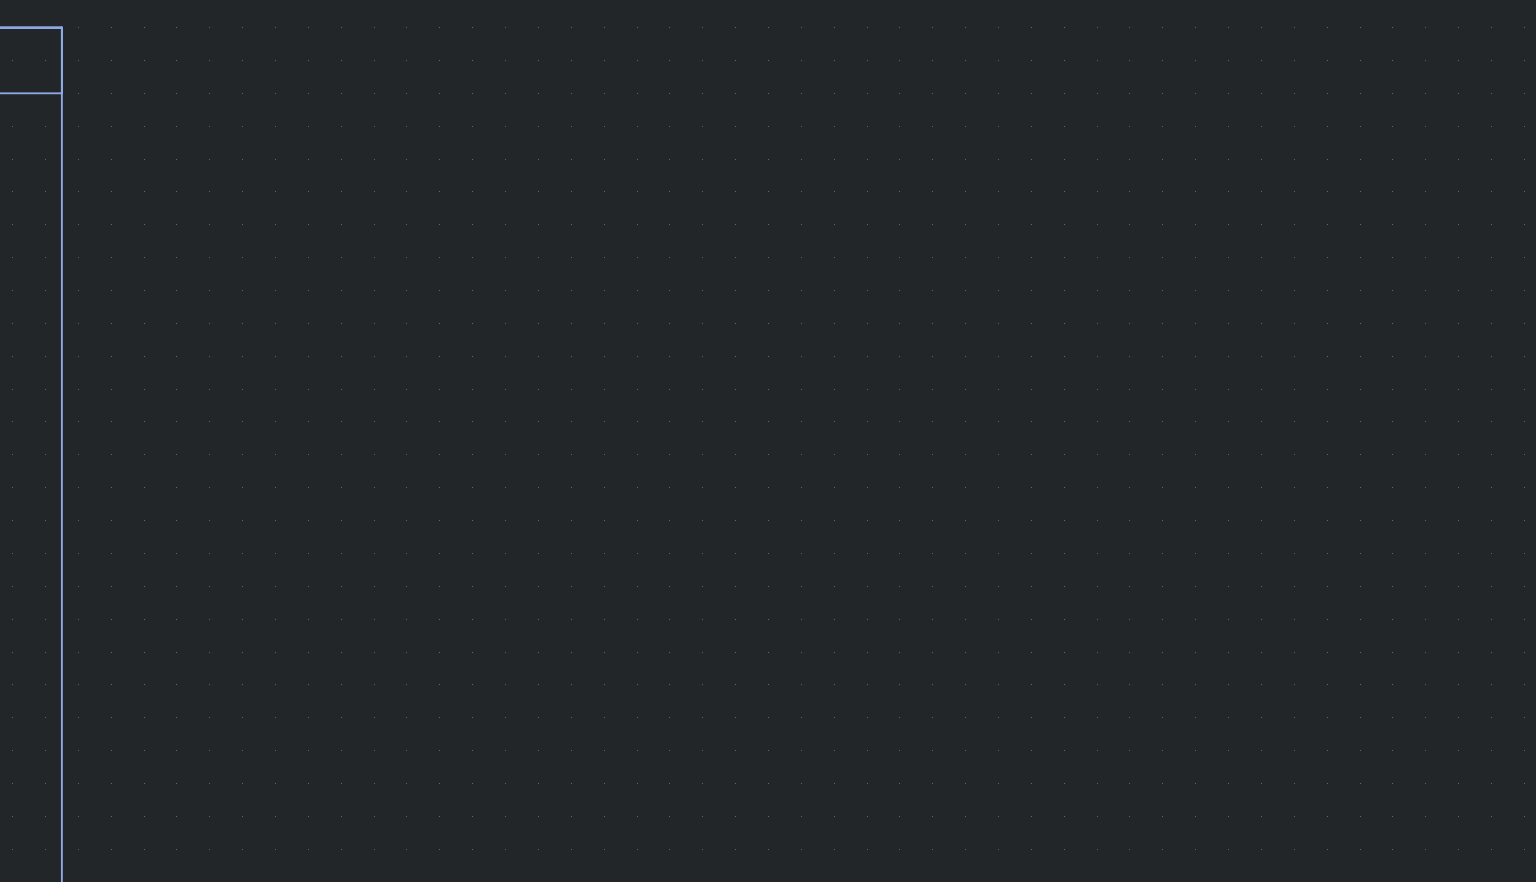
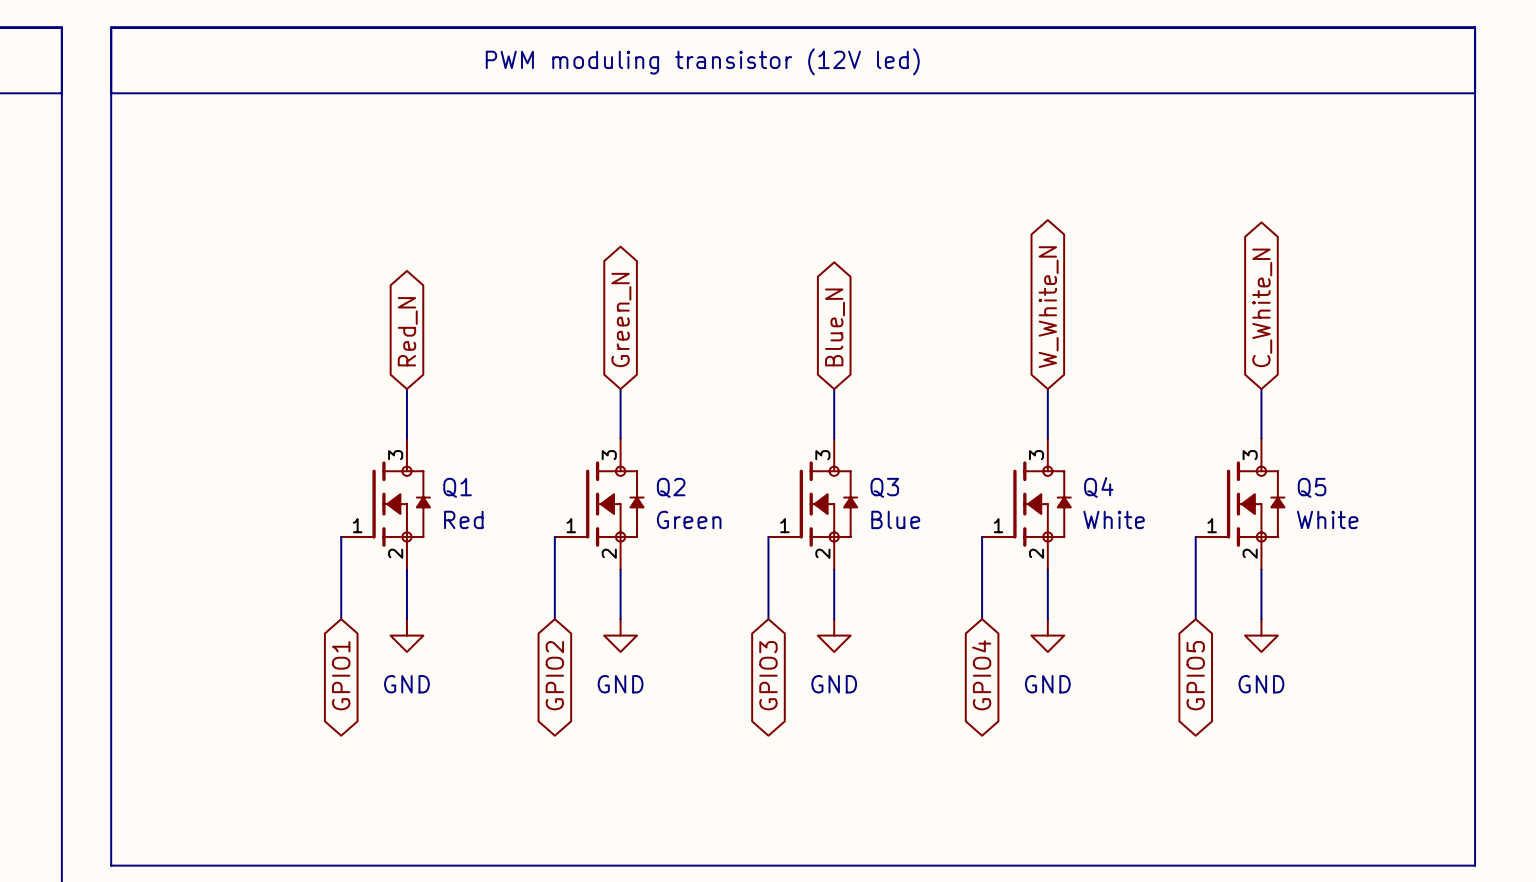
line: none -> (111, 27) (1475, 27) (1475, 865) (111, 865) (111, 27)
text: none -> PWM moduling transistor (12V led) (702, 61)
line: none -> (111, 93) (1475, 93)
global label: none -> W_White_N (1048, 307)
global label: none -> C_White_N (1262, 307)
global label: none -> Green_N (621, 320)
global label: none -> Blue_N (834, 327)
global label: none -> Red_N (407, 331)
wire: none -> (406, 389) (406, 438)
wire: none -> (620, 389) (620, 438)
wire: none -> (834, 389) (834, 438)
wire: none -> (1047, 389) (1047, 438)
wire: none -> (1261, 389) (1261, 438)
Q1: none -> Red (386, 504)
Q2: none -> Green (599, 504)
Q3: none -> Blue (813, 504)
Q4: none -> White (1026, 504)
Q5: none -> White (1240, 504)
wire: none -> (341, 536) (341, 619)
wire: none -> (554, 536) (554, 619)
wire: none -> (768, 536) (768, 619)
wire: none -> (982, 536) (982, 619)
wire: none -> (1195, 536) (1195, 619)
wire: none -> (406, 569) (406, 619)
wire: none -> (620, 569) (620, 619)
wire: none -> (834, 569) (834, 619)
wire: none -> (1047, 569) (1047, 619)
wire: none -> (1261, 569) (1261, 619)
power symbol: none -> GND (406, 635)
power symbol: none -> GND (620, 635)
power symbol: none -> GND (834, 635)
power symbol: none -> GND (1047, 635)
power symbol: none -> GND (1261, 635)
global label: none -> GPIO1 (341, 675)
global label: none -> GPIO2 (554, 675)
global label: none -> GPIO3 (768, 675)
global label: none -> GPIO4 (981, 675)
global label: none -> GPIO5 (1195, 675)

